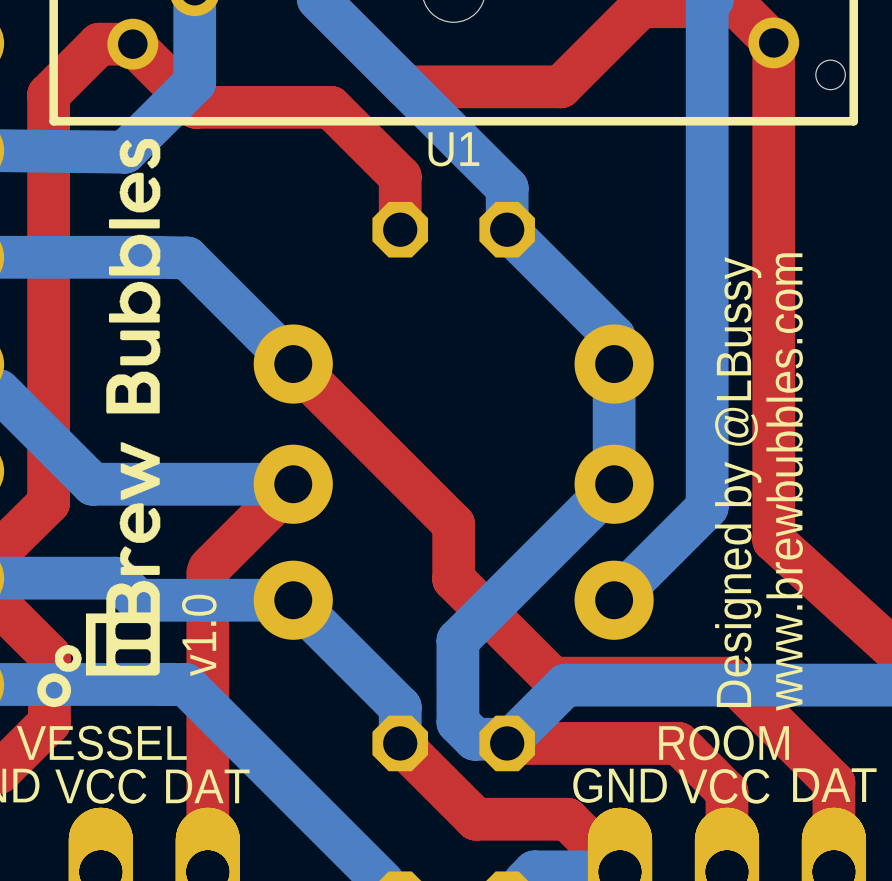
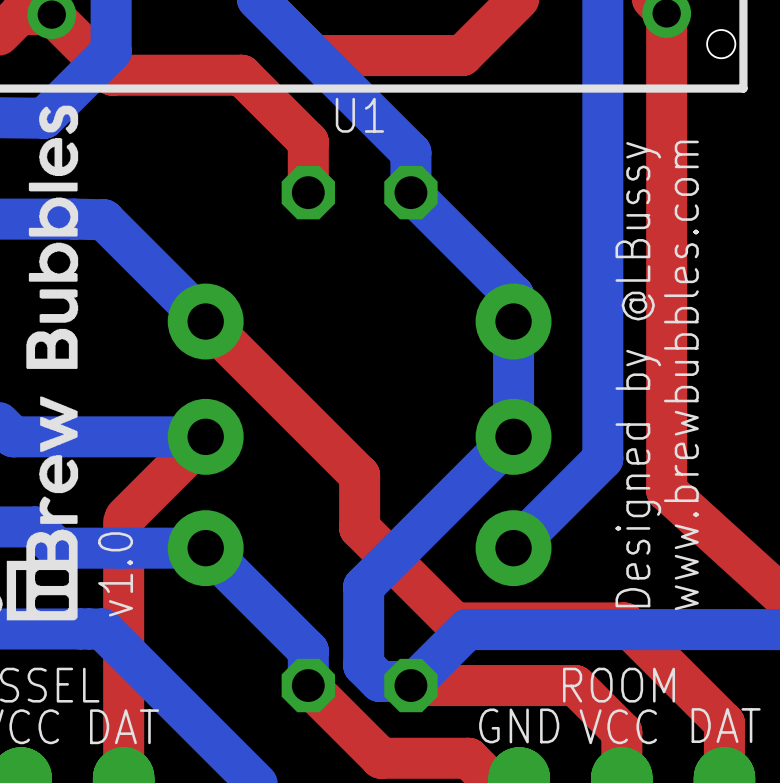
text position: Designed by @LBussy (738, 482) -> Designed by @LBussy (638, 374)
text position: www.brewbubbles.com (784, 482) -> www.brewbubbles.com (681, 375)

